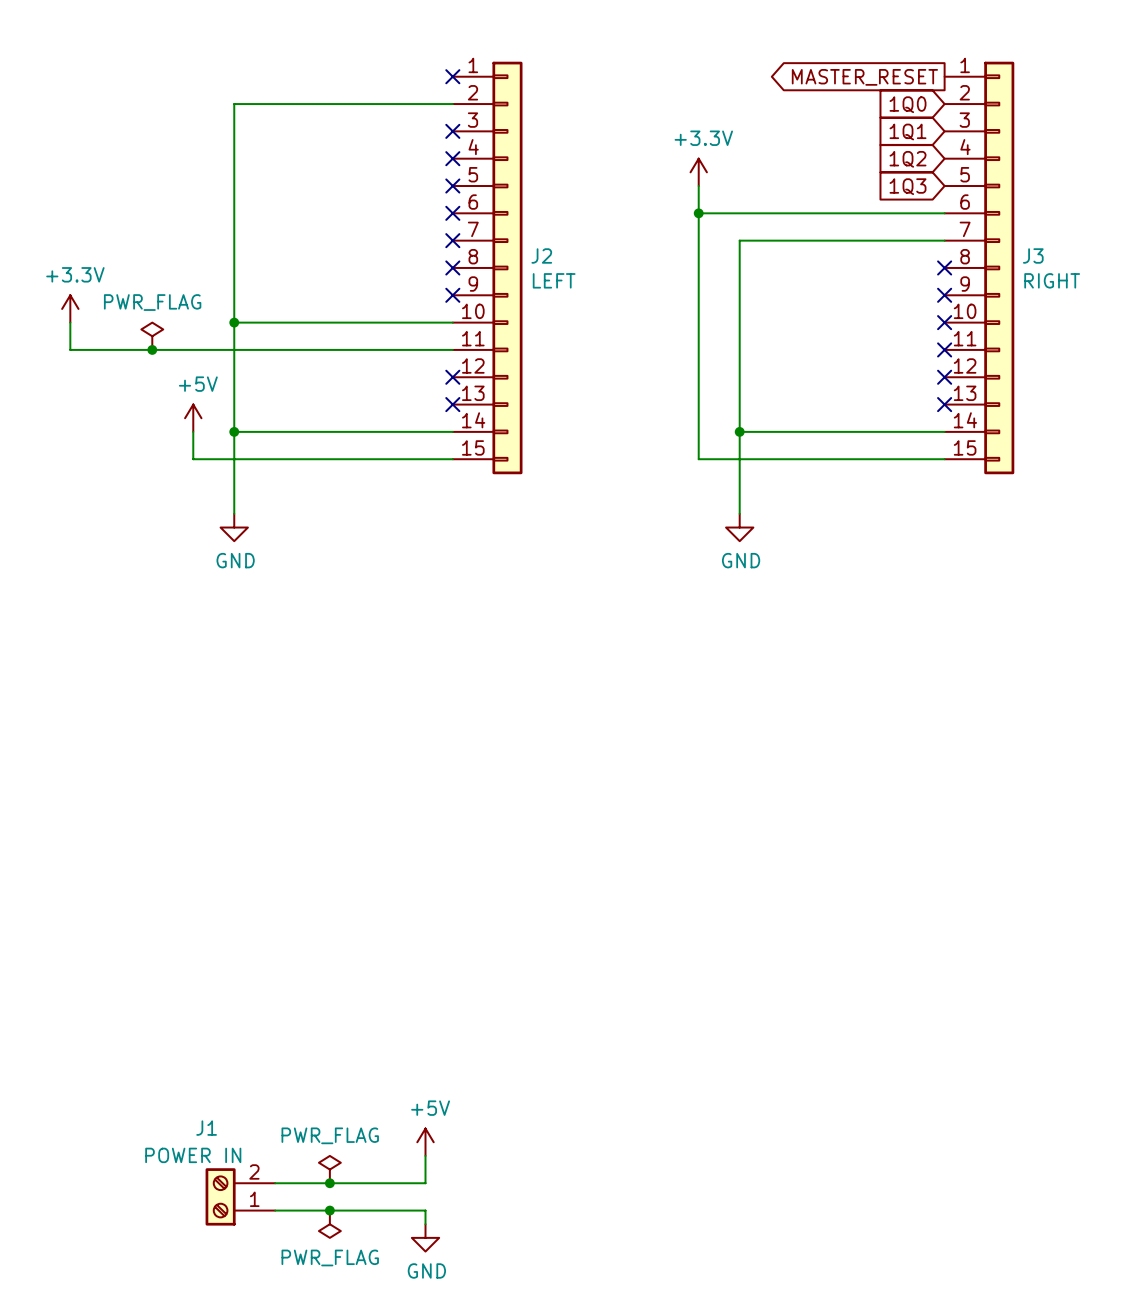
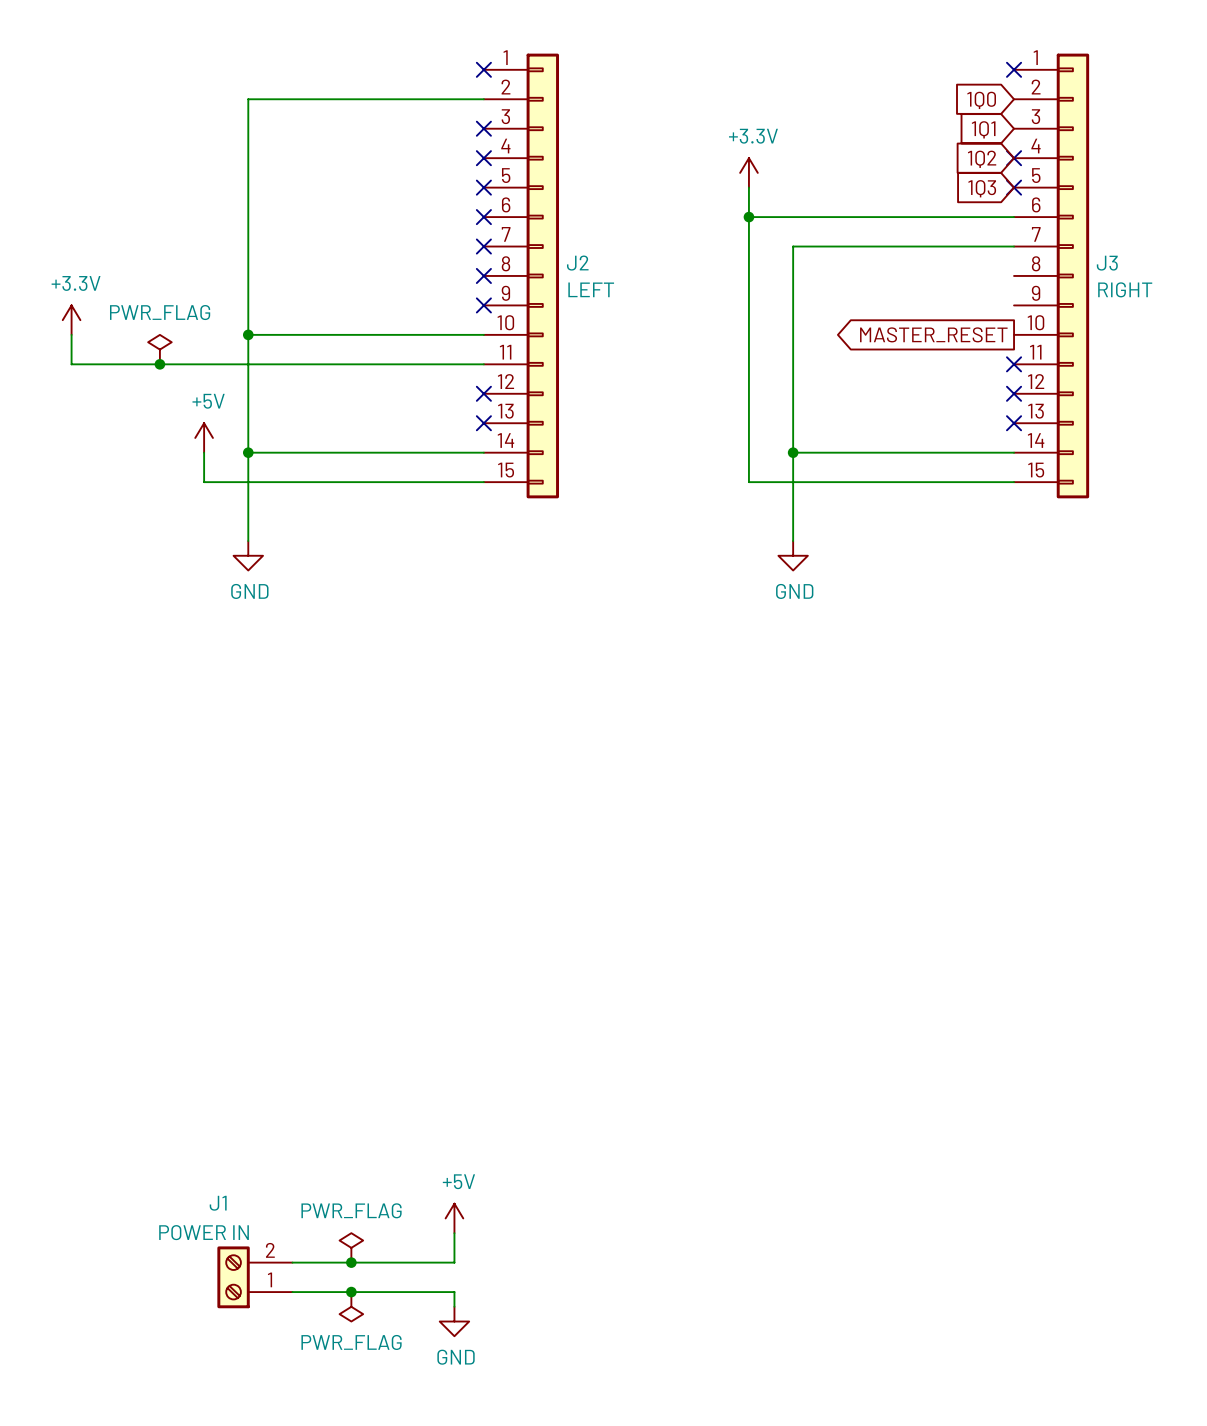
no-connect mark: none -> (1014, 69)
global label position: MASTER_RESET (864, 77) -> MASTER_RESET (933, 334)
no-connect mark: none -> (1014, 158)
no-connect mark: none -> (1014, 187)
no-connect mark: (944, 267) -> none
no-connect mark: (944, 295) -> none
no-connect mark: (944, 322) -> none

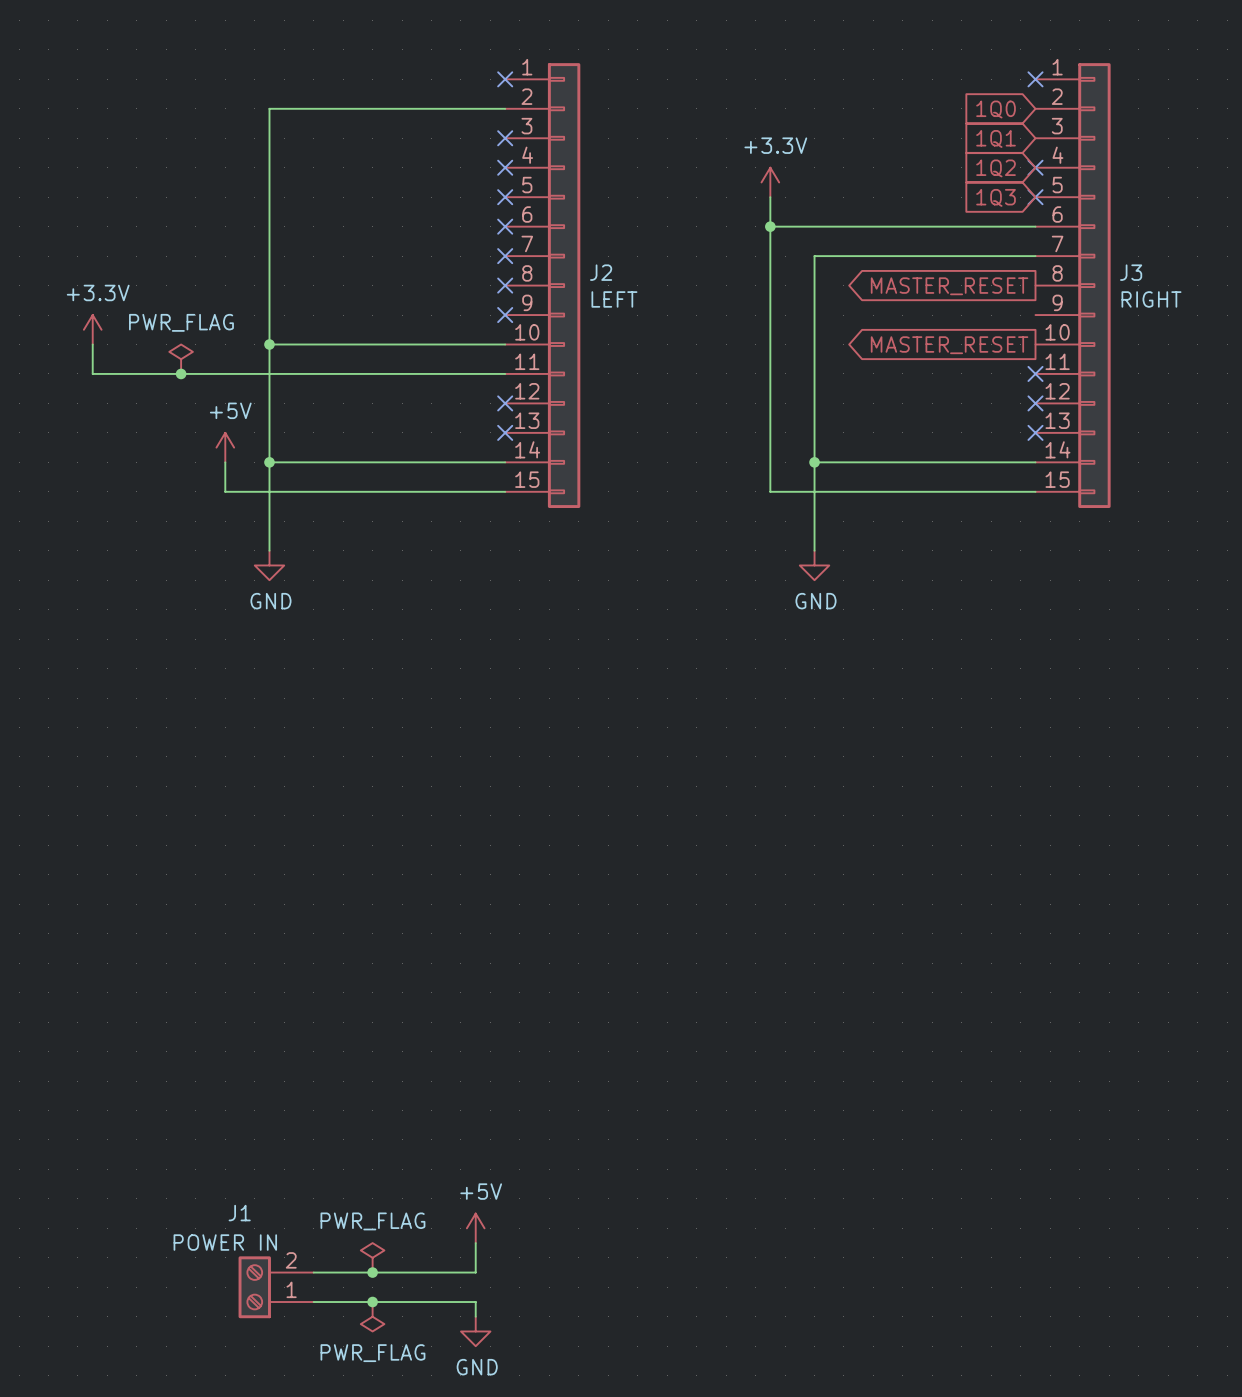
global label: none -> MASTER_RESET (949, 286)

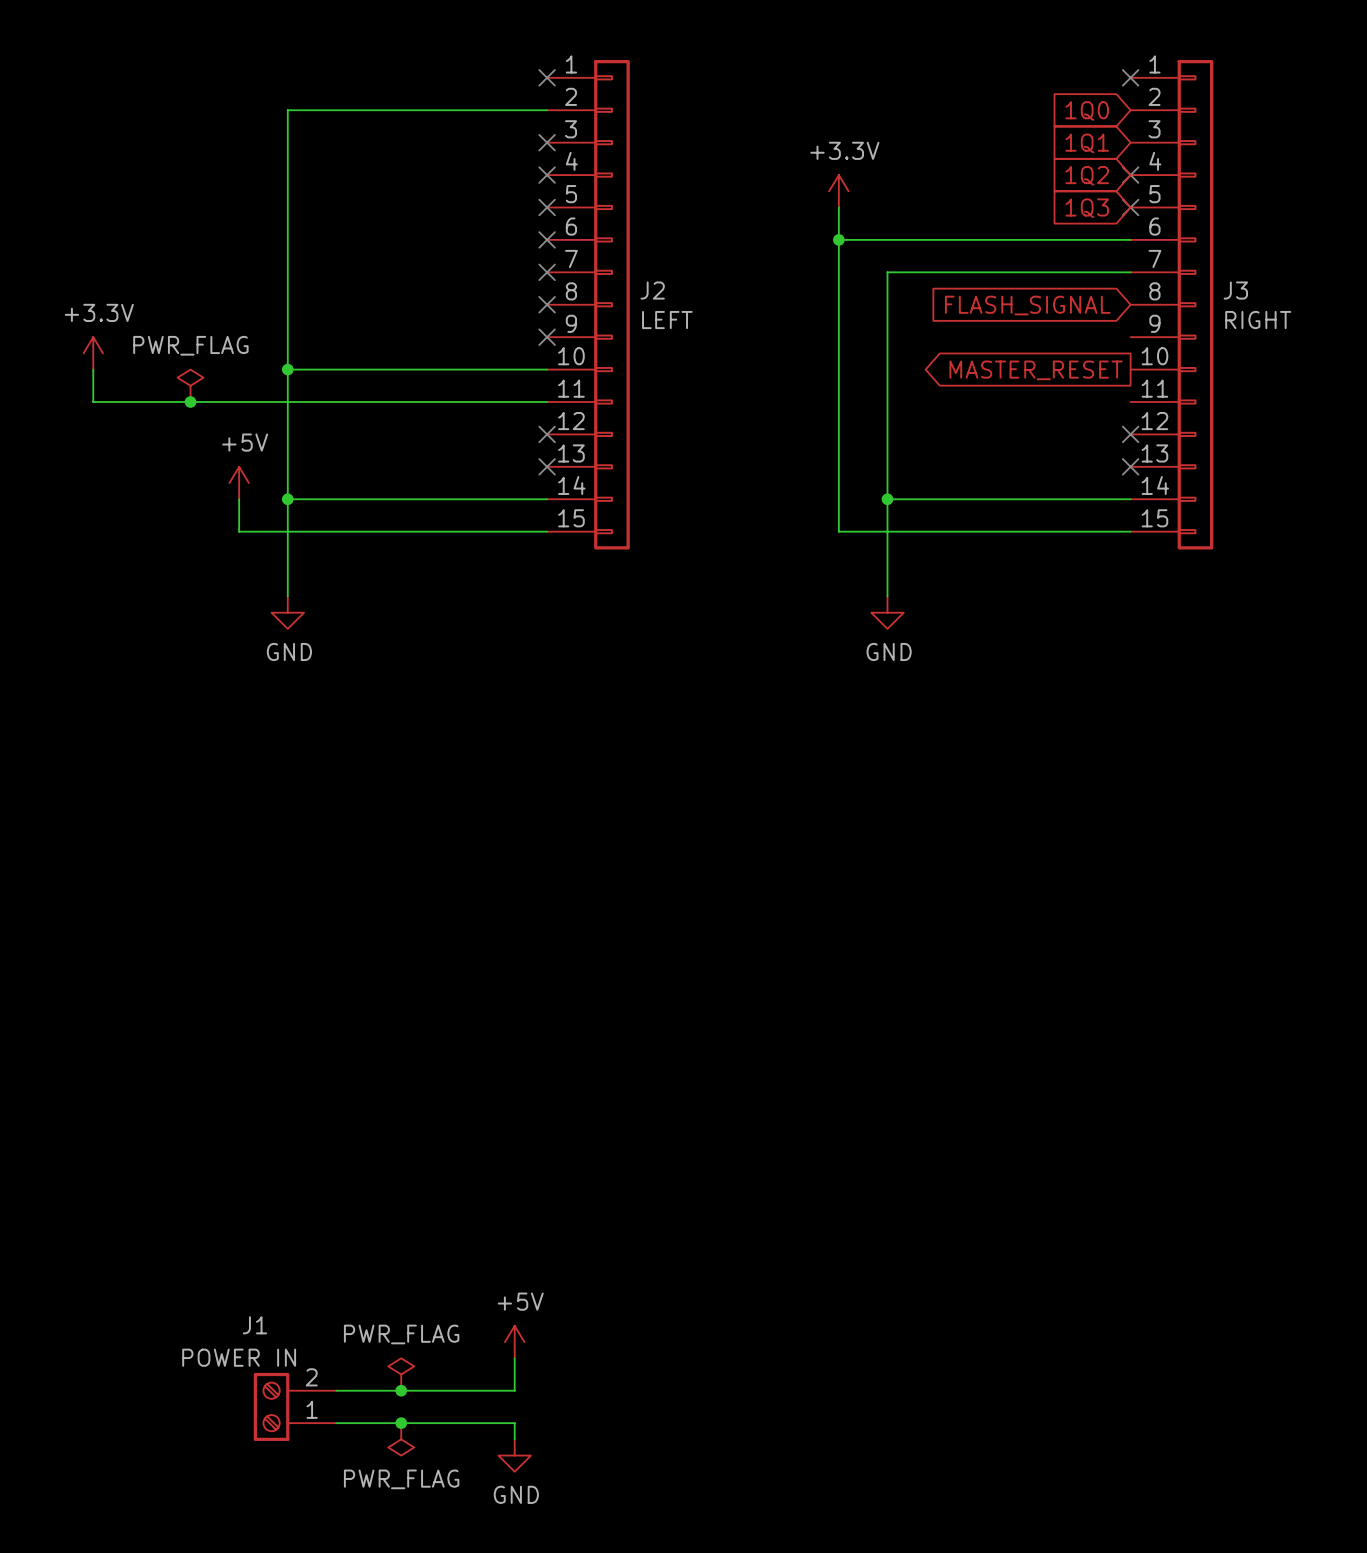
global label shape: output (949, 286) -> input (1027, 305)
global label: MASTER_RESET (949, 286) -> FLASH_SIGNAL (1027, 305)
no-connect mark: (1035, 373) -> none

